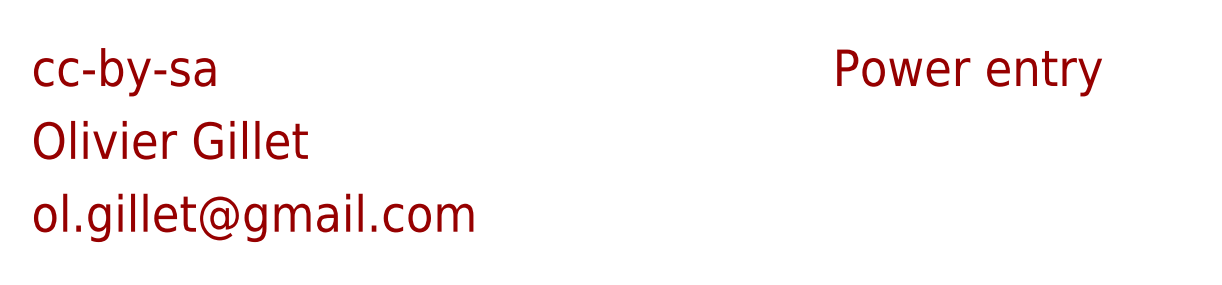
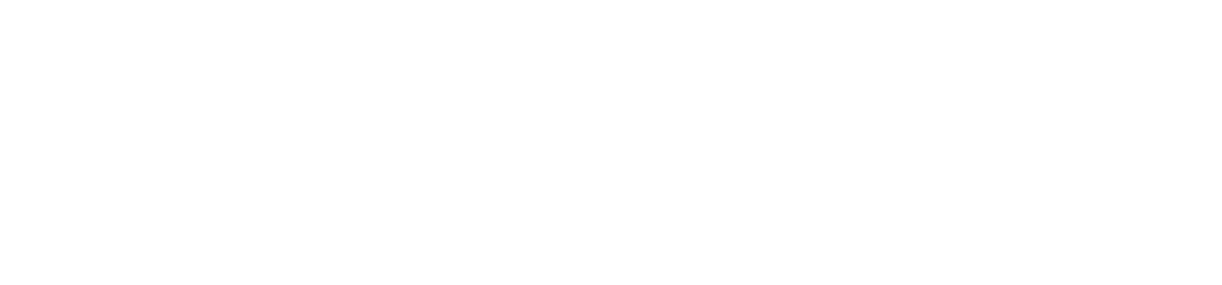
text: cc-by-sa (124, 72) -> none
text: Power entry (969, 73) -> none
text: Olivier Gillet (170, 140) -> none
text: ol.gillet@gmail.com (253, 217) -> none

